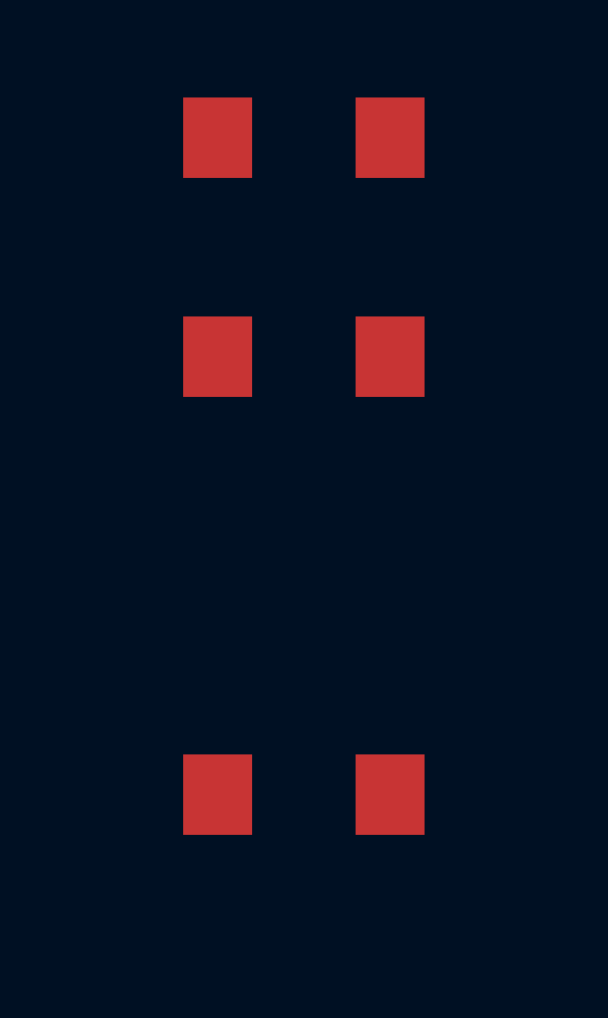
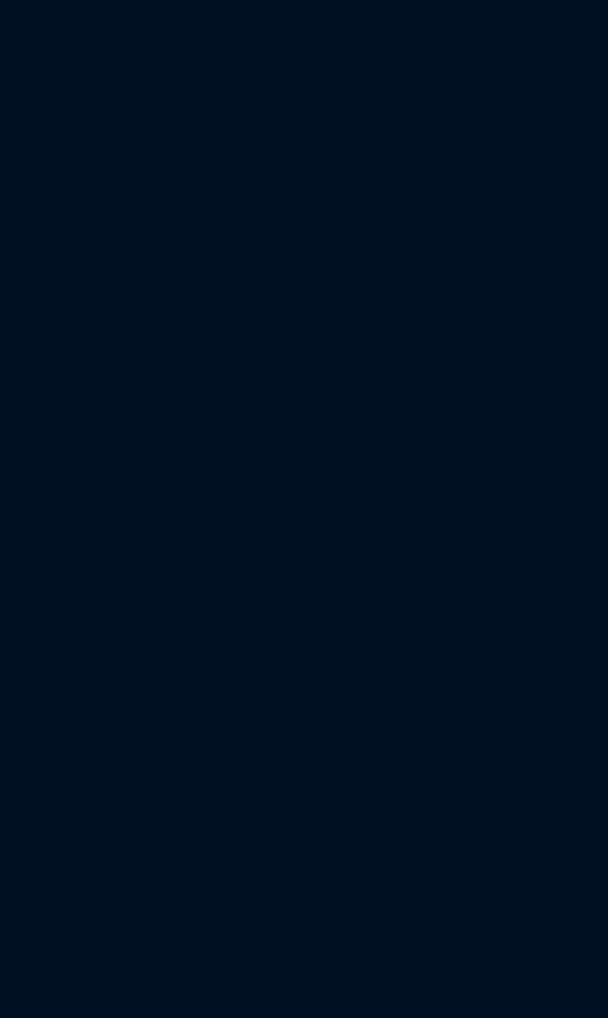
part: (303, 137) -> none
part: (303, 356) -> none
part: (303, 794) -> none

